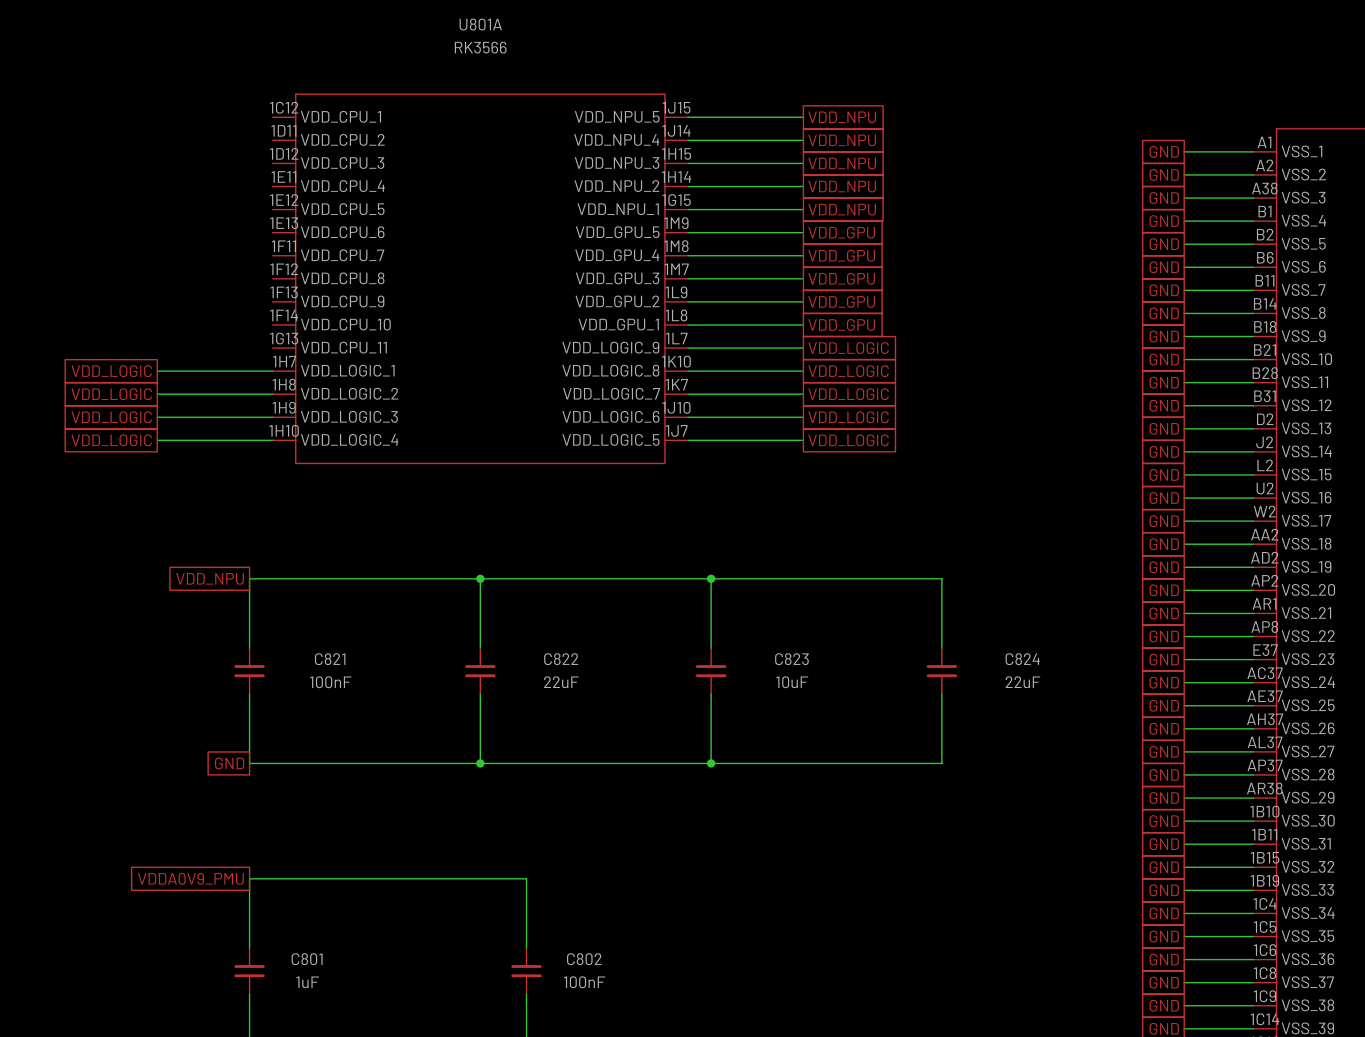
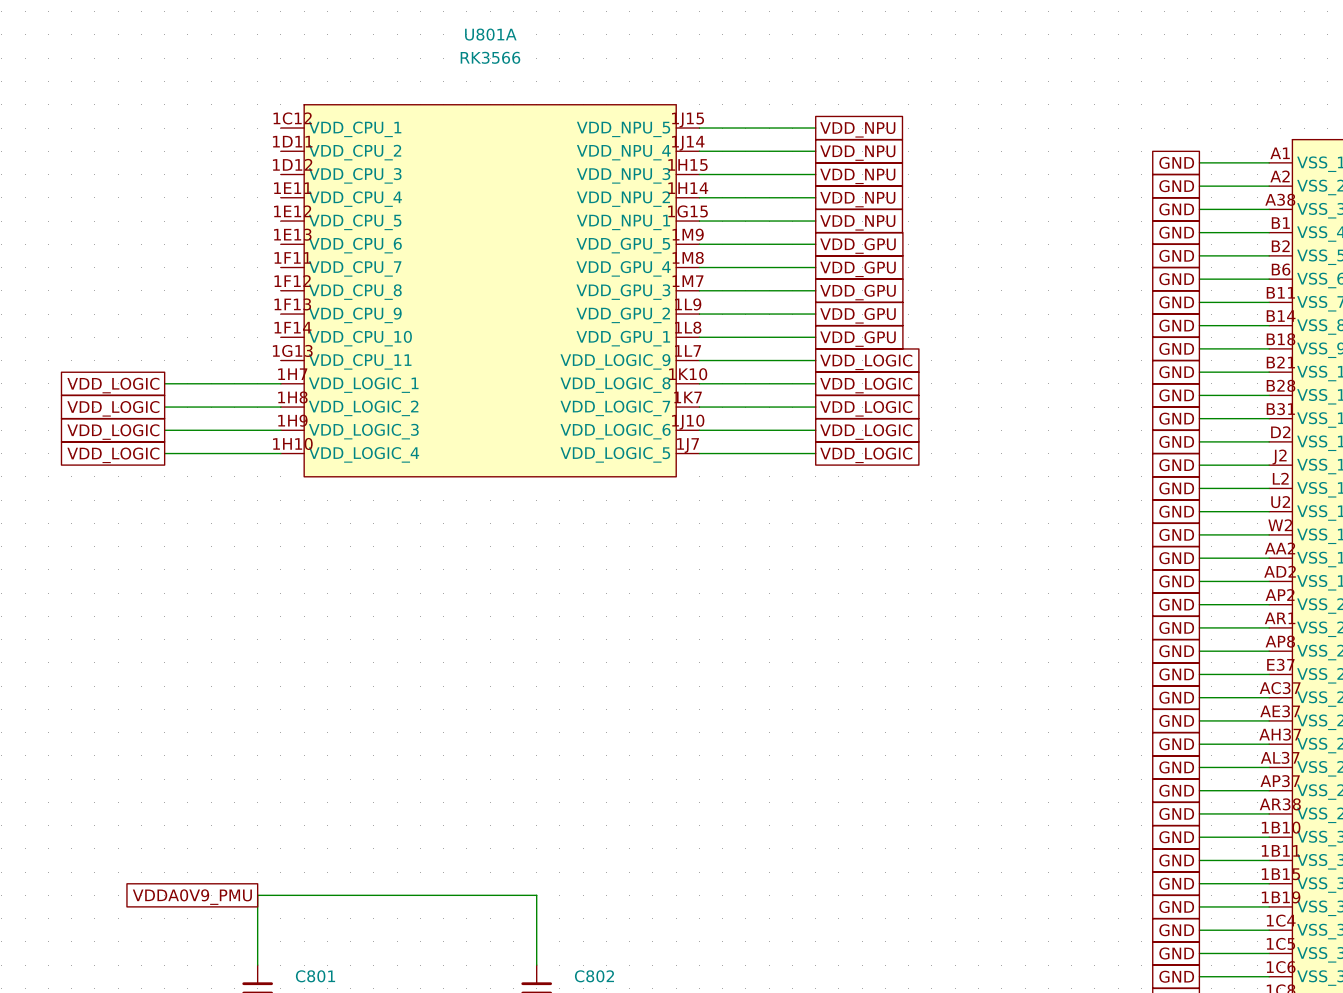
global label: VDD_NPU (210, 578) -> none
wire: (480, 578) (480, 648) -> none
junction: (480, 578) -> none
wire: (711, 578) (711, 648) -> none
junction: (711, 578) -> none
wire: (249, 648) (249, 578) (941, 578) (941, 648) -> none
C821: 100nF (249, 671) -> none
C822: 22uF (480, 671) -> none
C823: 10uF (711, 671) -> none
C824: 22uF (941, 671) -> none
wire: (249, 694) (249, 763) (941, 763) (941, 694) -> none
wire: (480, 694) (480, 763) -> none
wire: (711, 694) (711, 763) -> none
global label: GND (229, 763) -> none
junction: (480, 763) -> none
junction: (711, 763) -> none

